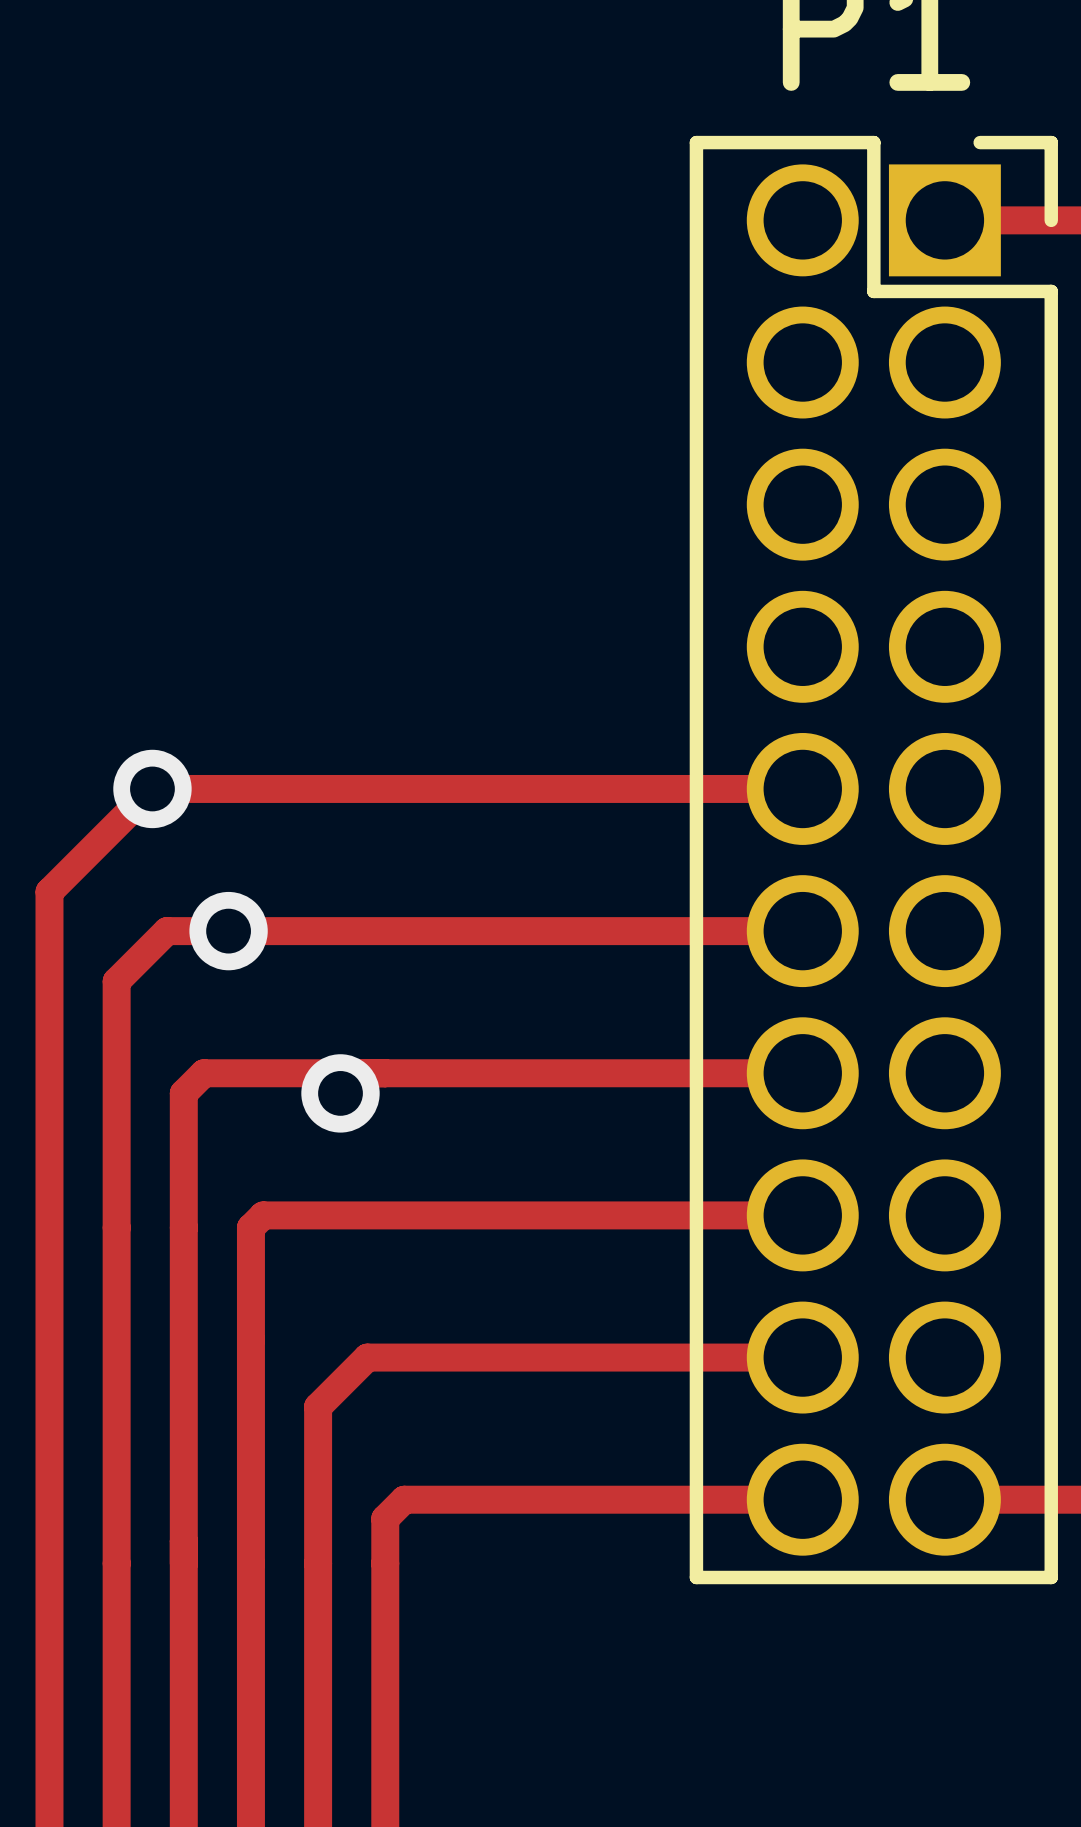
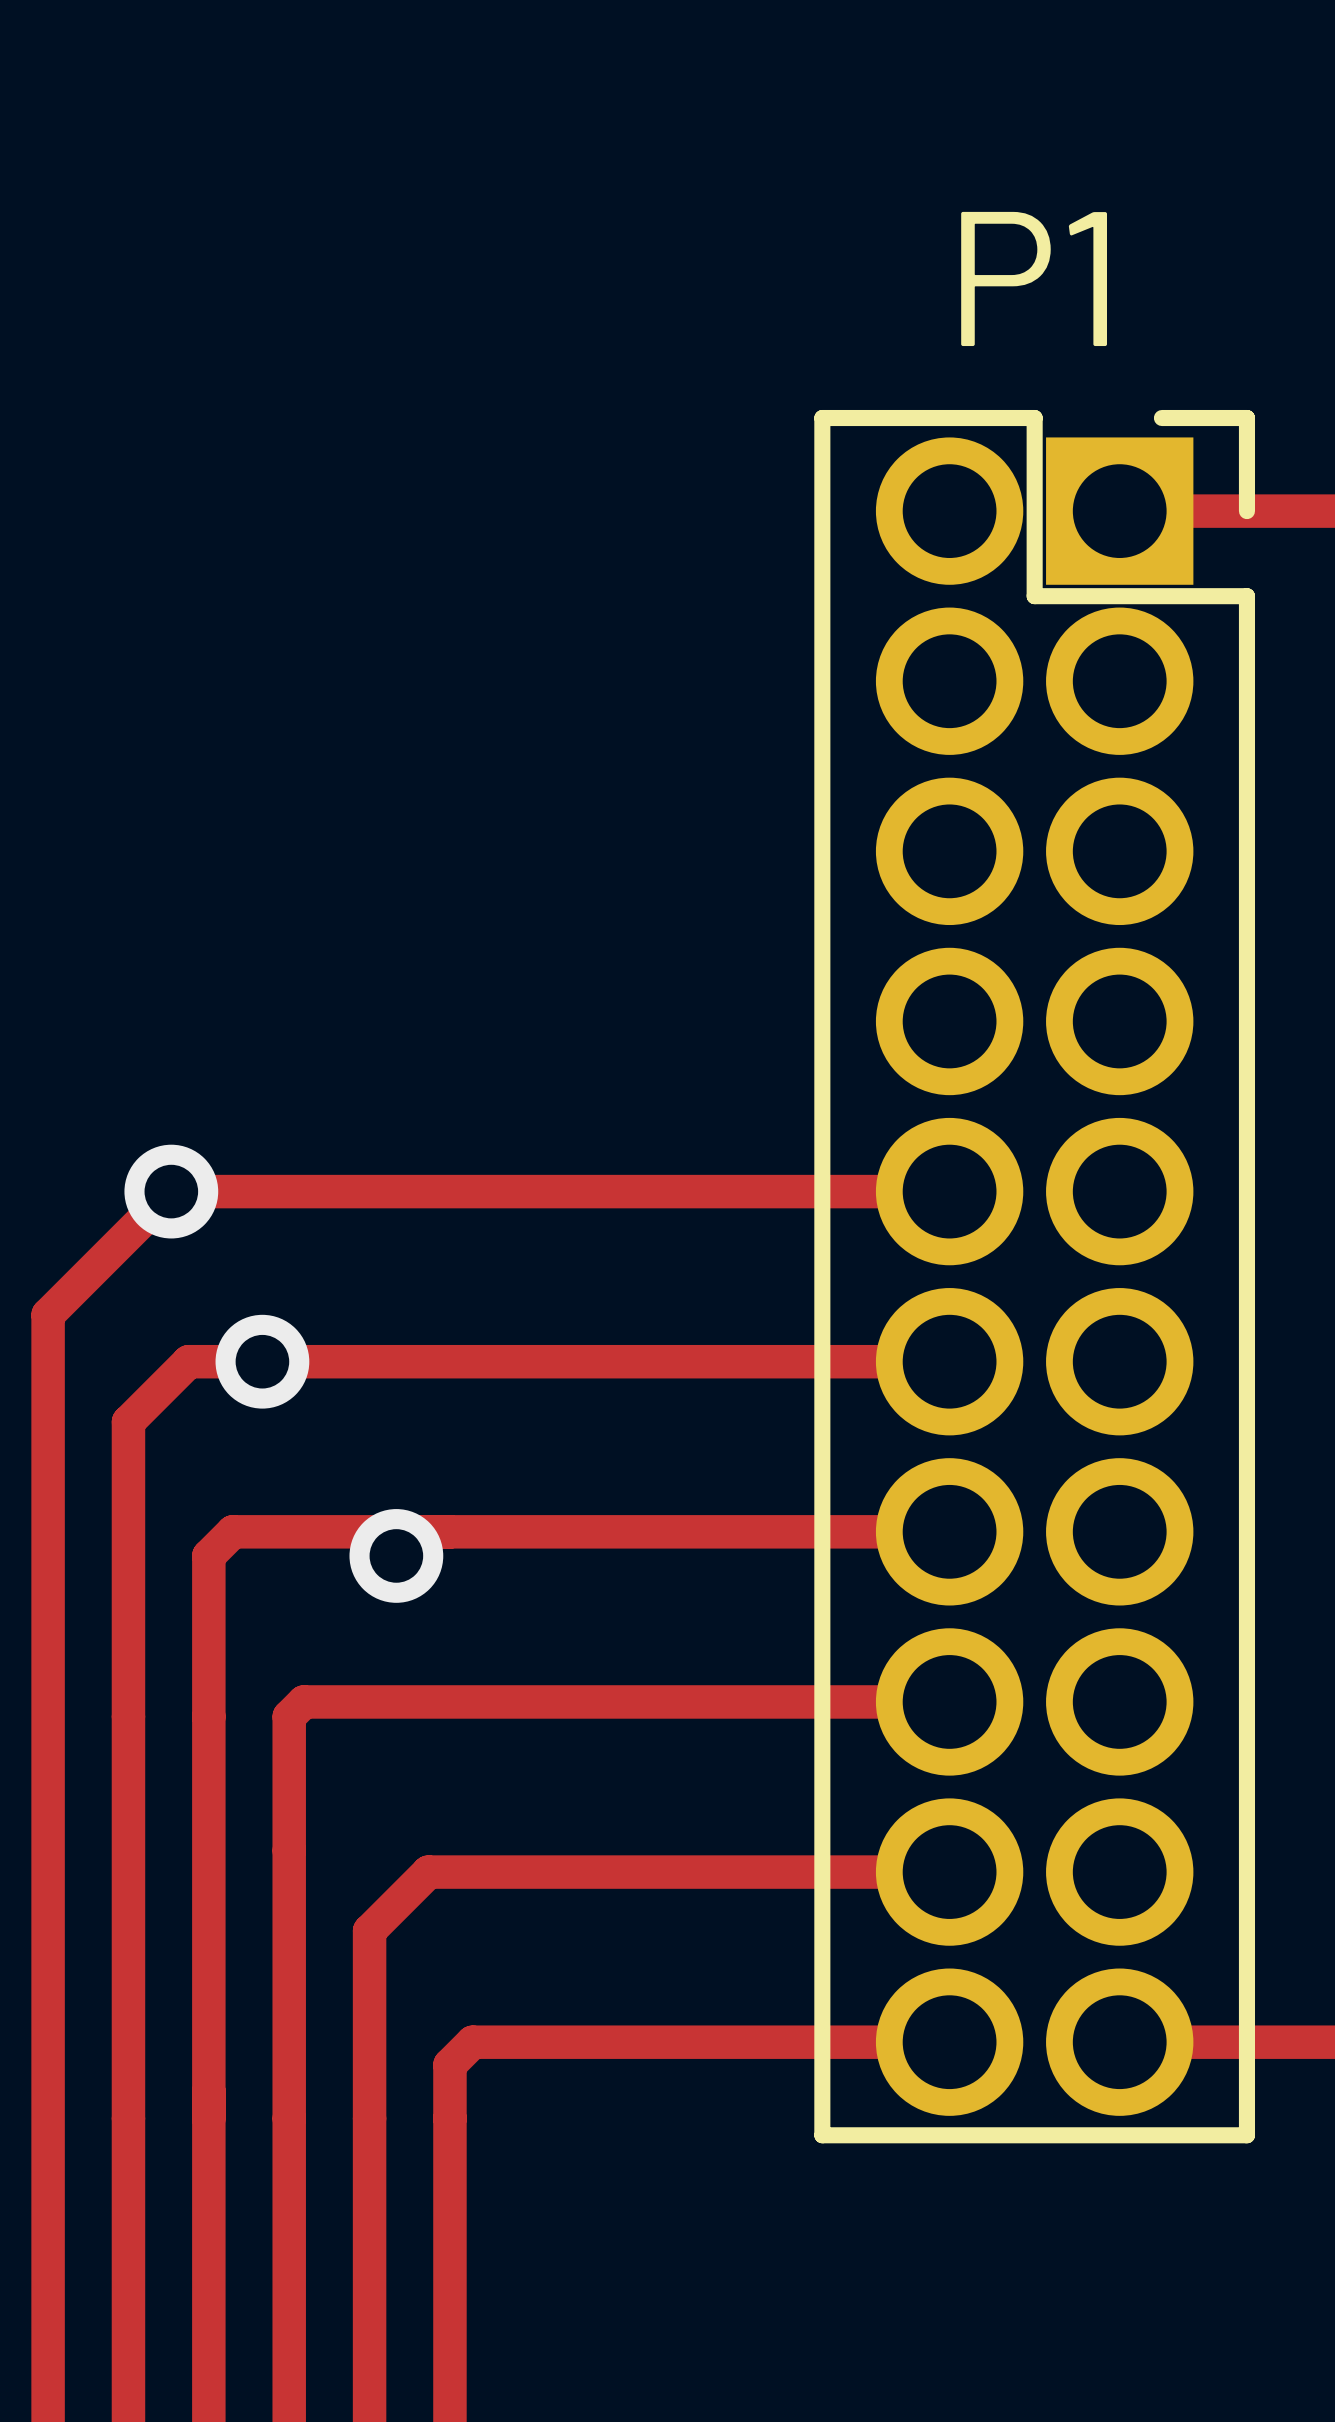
P1 footprint: [689, 135, 1058, 1585] -> [814, 409, 1256, 2144]

